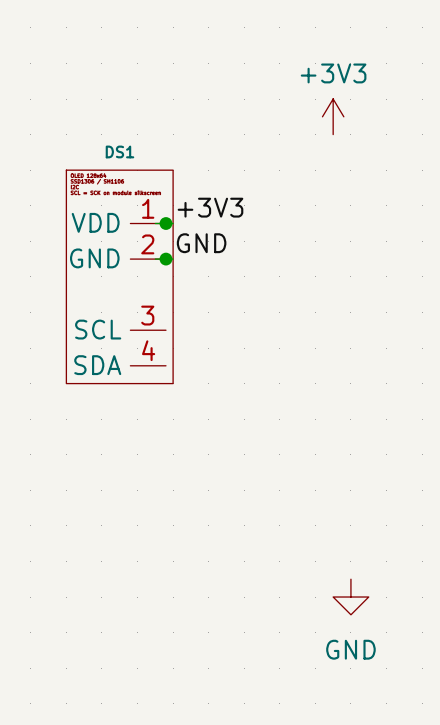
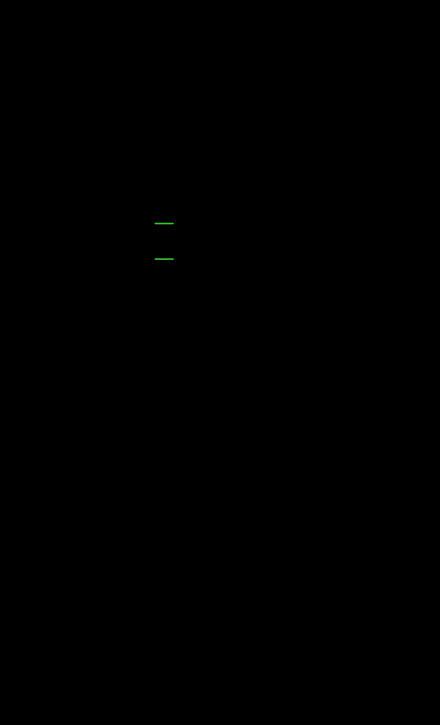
power symbol: +3V3 (333, 116) -> none
label: +3V3 (210, 207) -> none
junction: (165, 223) -> none
label: GND (201, 243) -> none
junction: (165, 259) -> none
DS1: (119, 276) -> none
power symbol: GND (350, 597) -> none

